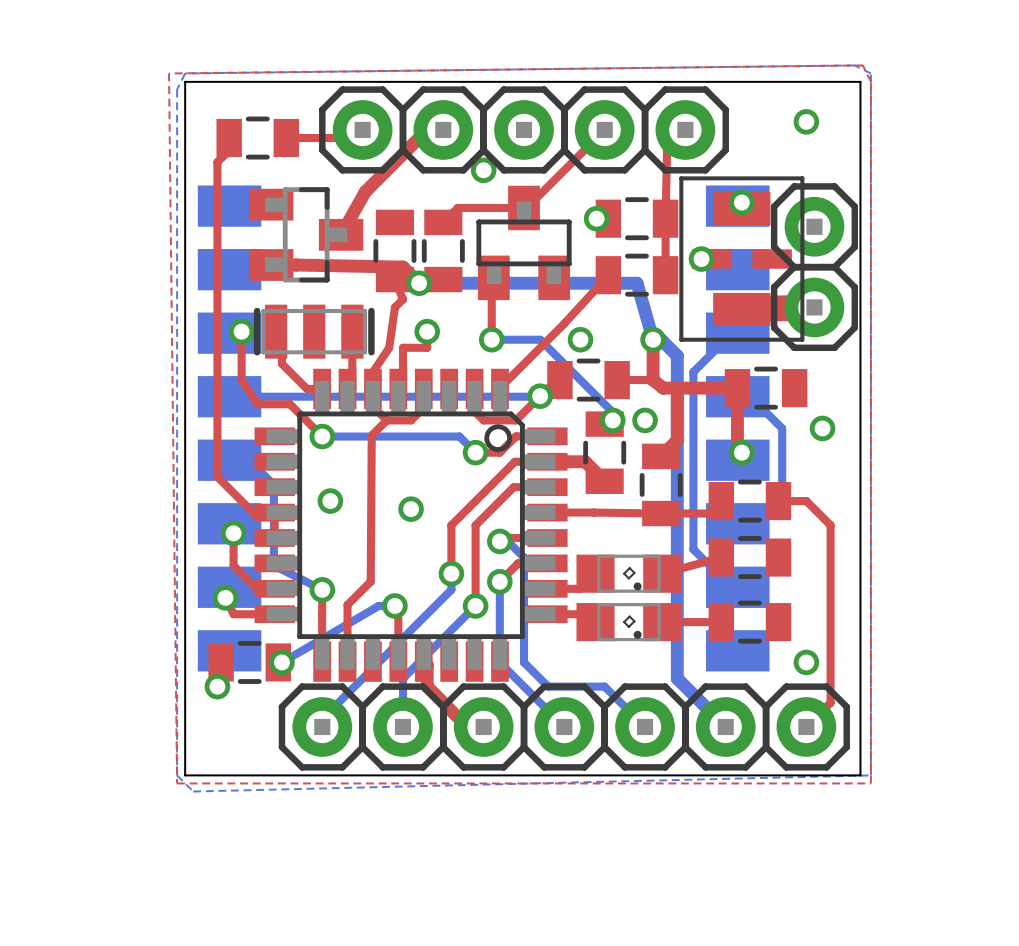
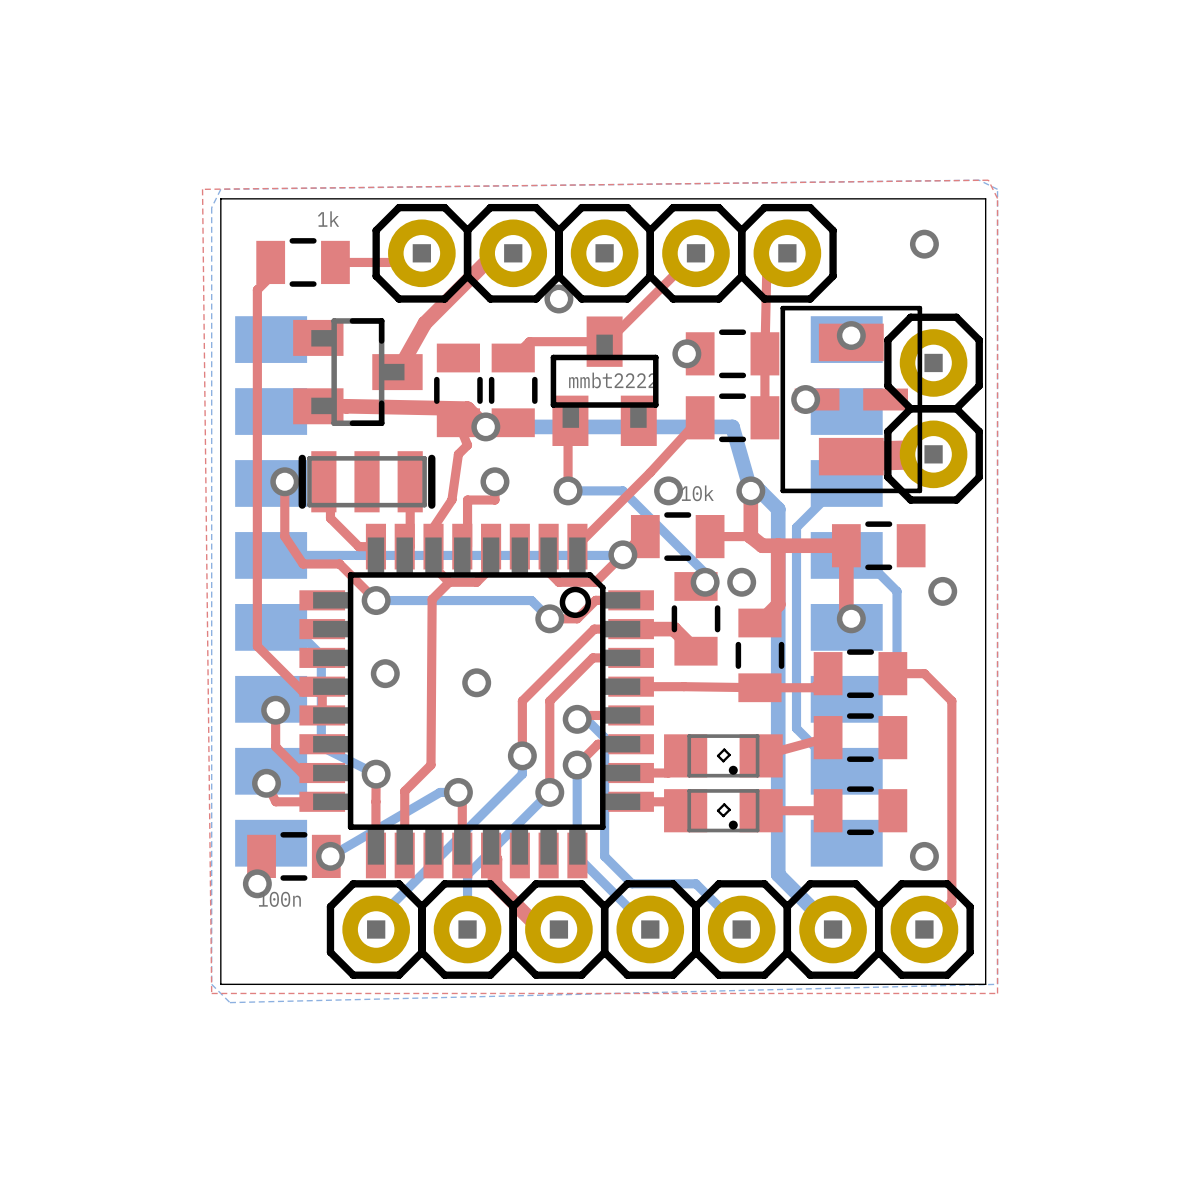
part value: none -> 1k (328, 219)
part value: none -> mmbt2222 (613, 380)
part value: none -> 10k (697, 493)
part value: none -> 100n (279, 899)

